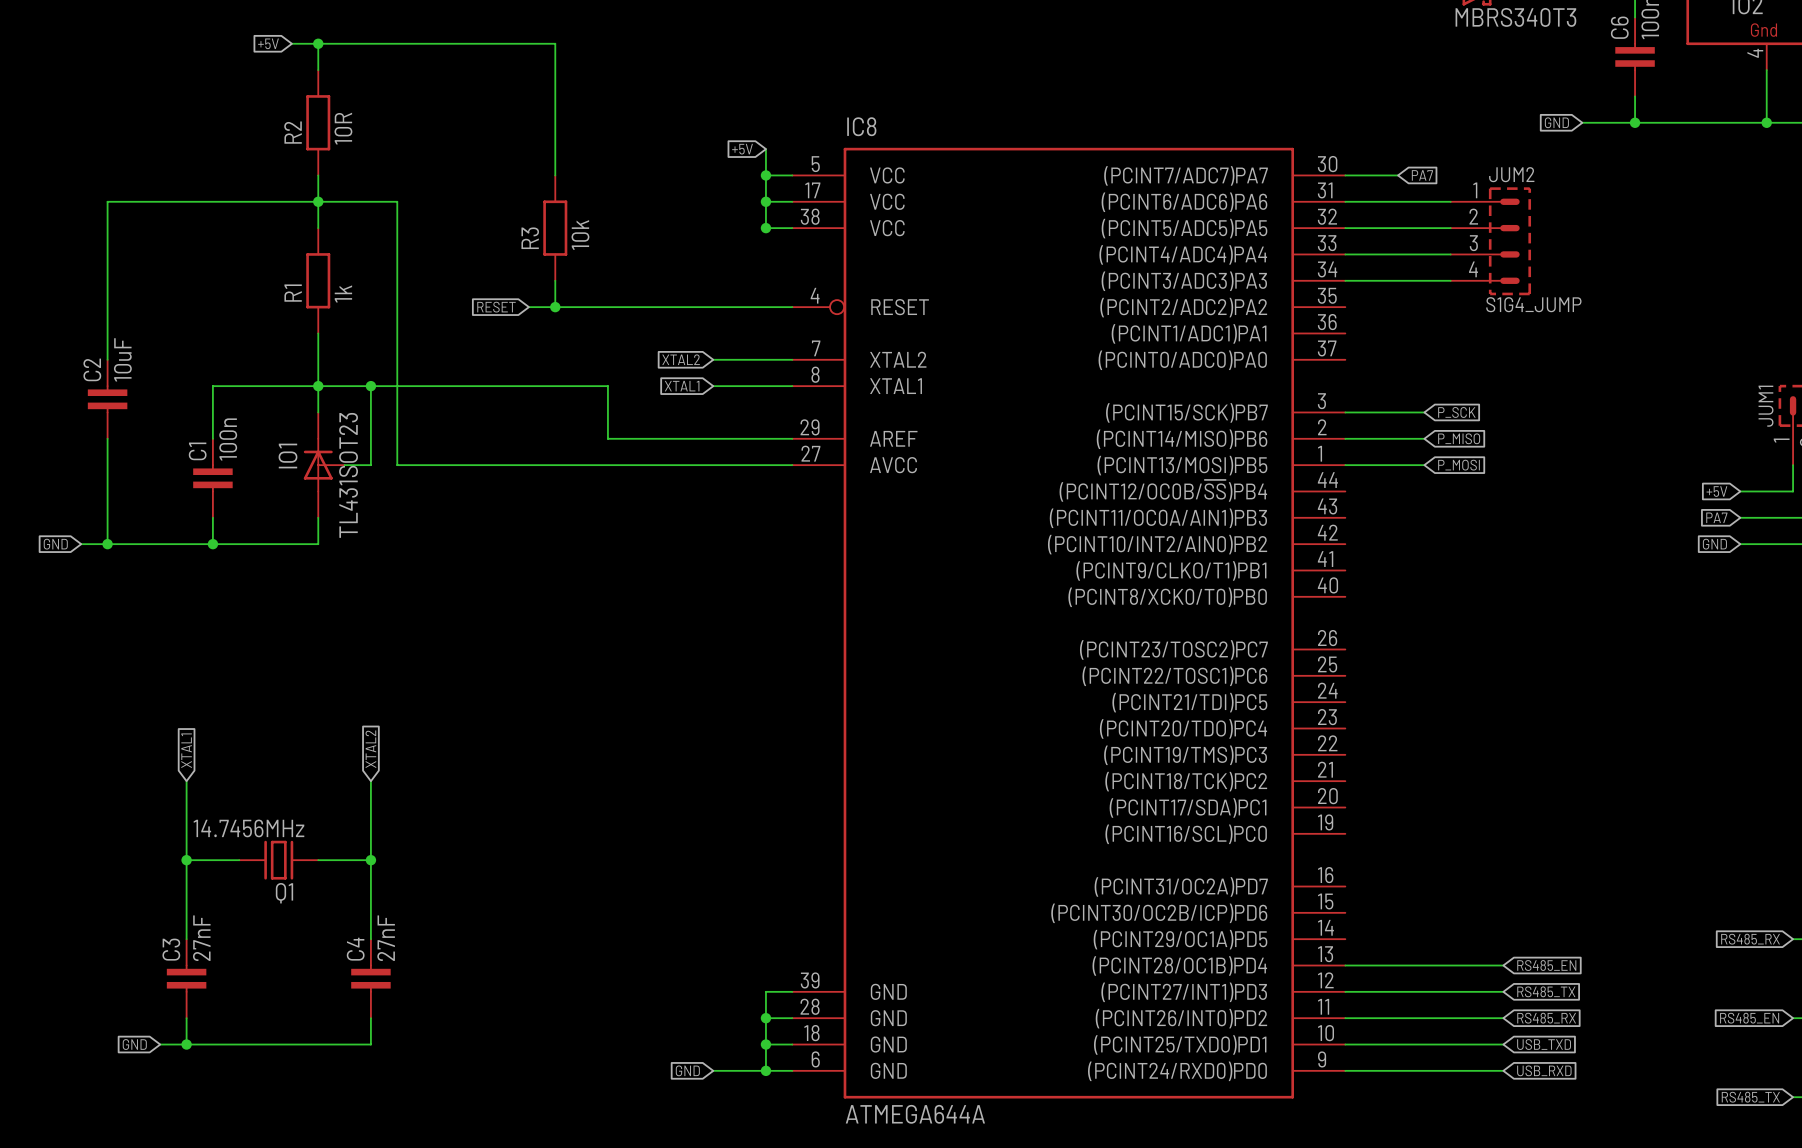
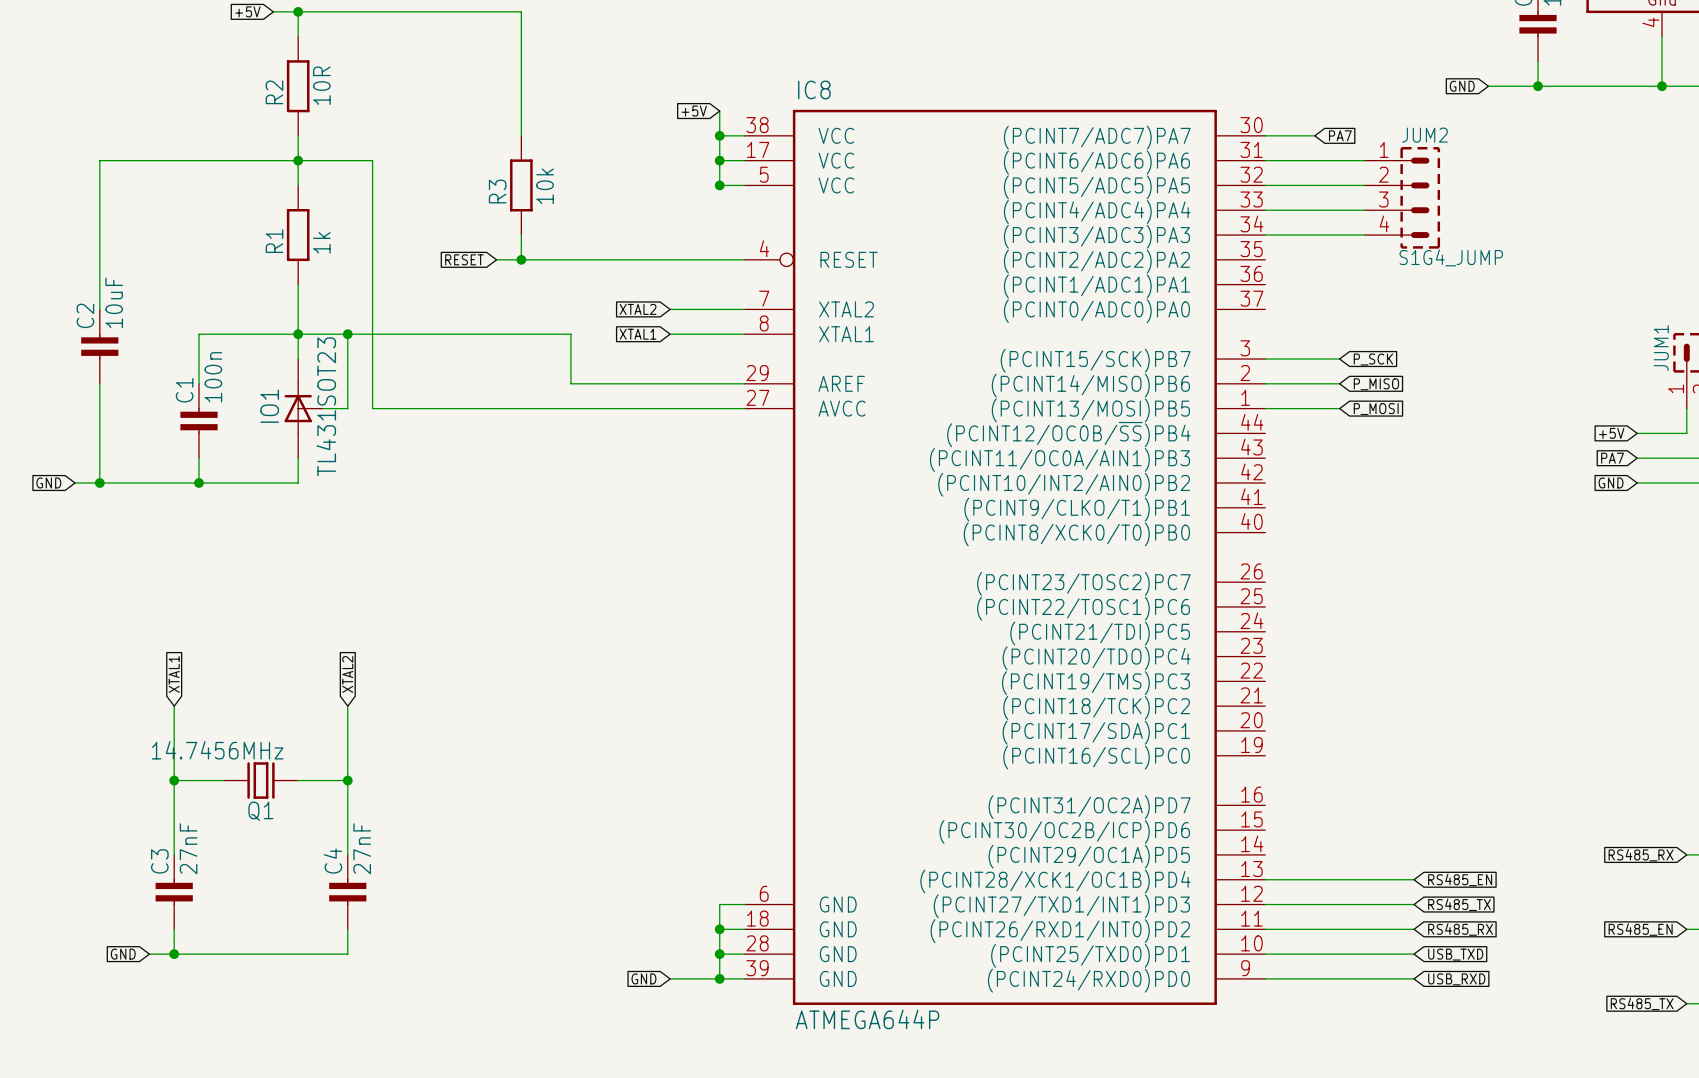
IC8 symbol: [792, 147, 1346, 1099] -> [744, 109, 1266, 1005]
IC8 value: ATMEGA644A (915, 1114) -> ATMEGA644P (867, 1019)

